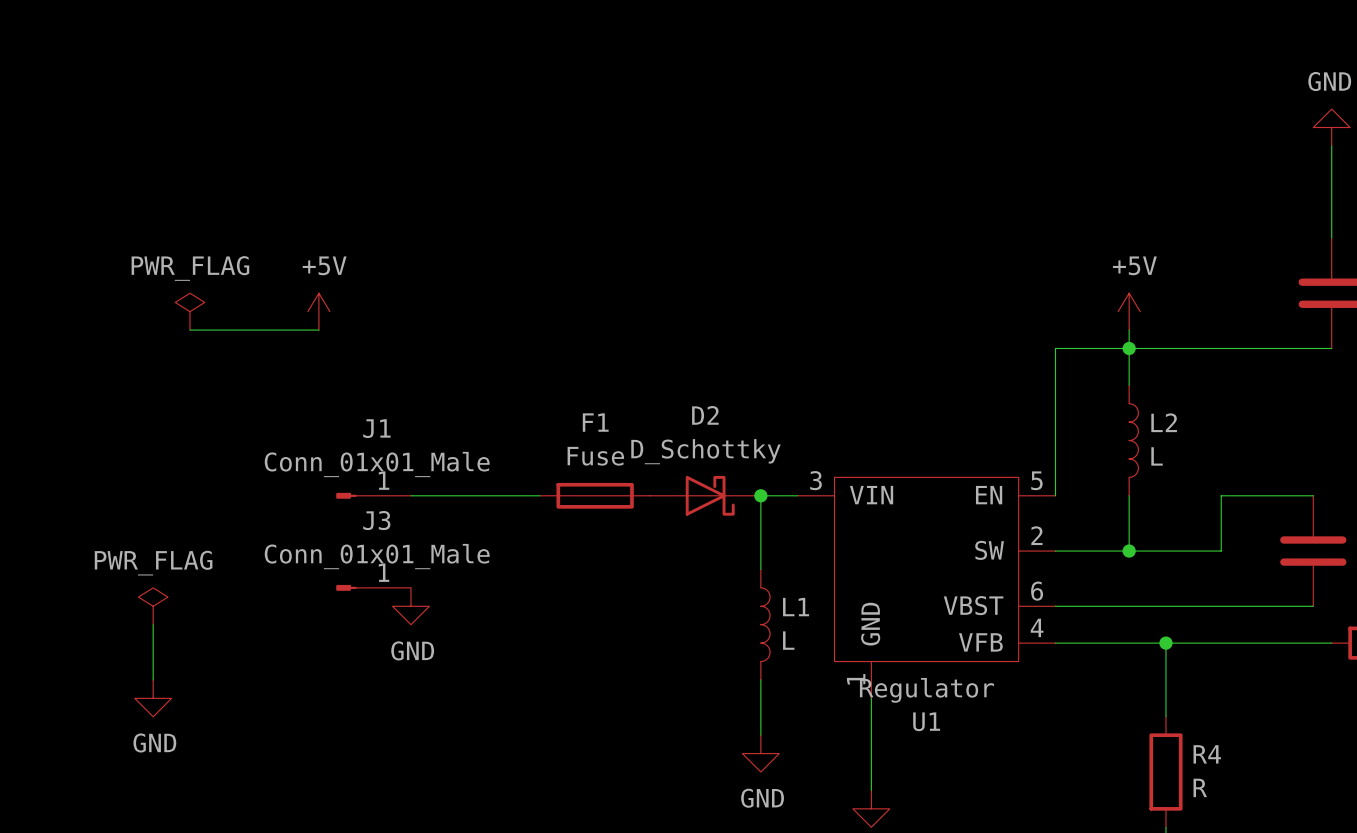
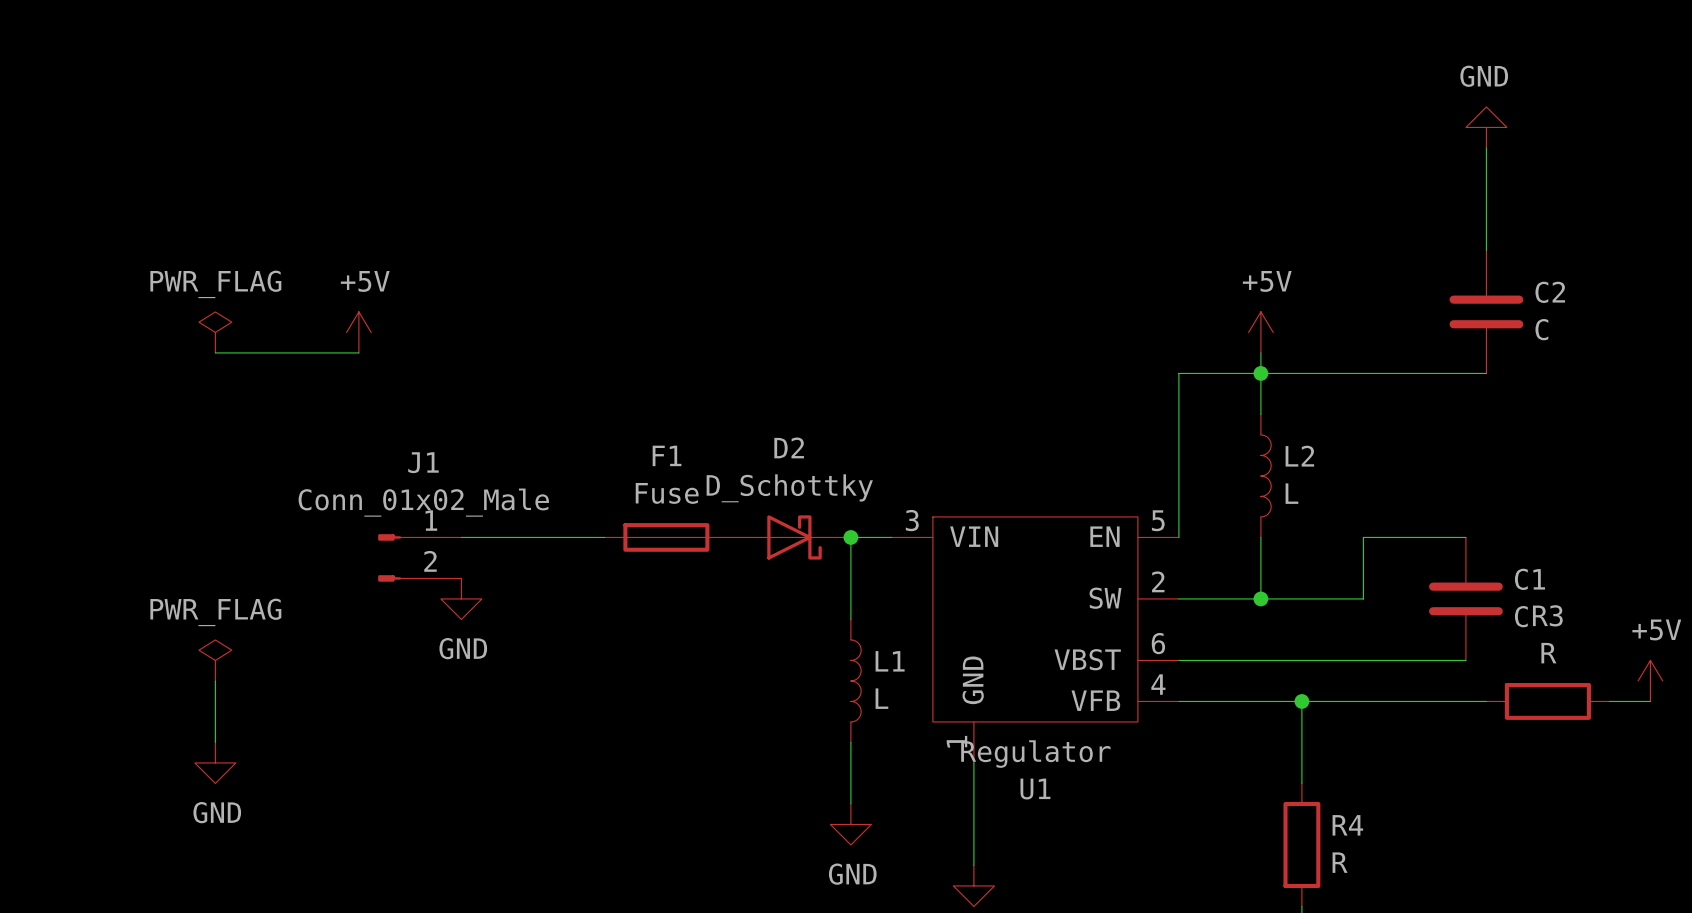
J1 value: Conn_01x01_Male (377, 464) -> Conn_01x02_Male (423, 502)
J1 symbol: [336, 492, 411, 499] -> [378, 534, 462, 582]
J3: Conn_01x01_Male (373, 587) -> none
power symbol position: PWR_FLAG (153, 606) -> PWR_FLAG (215, 660)
power symbol position: GND (410, 606) -> GND (461, 598)
wire: (153, 624) (153, 679) -> (215, 680) (215, 742)
power symbol position: GND (153, 698) -> GND (215, 762)

